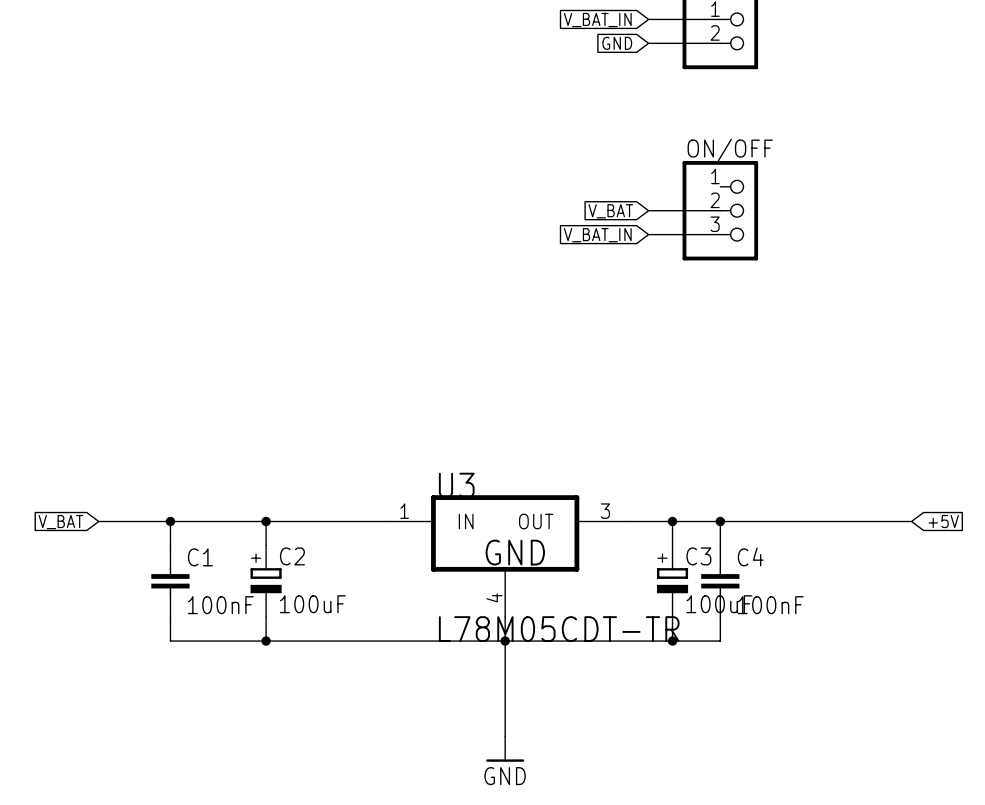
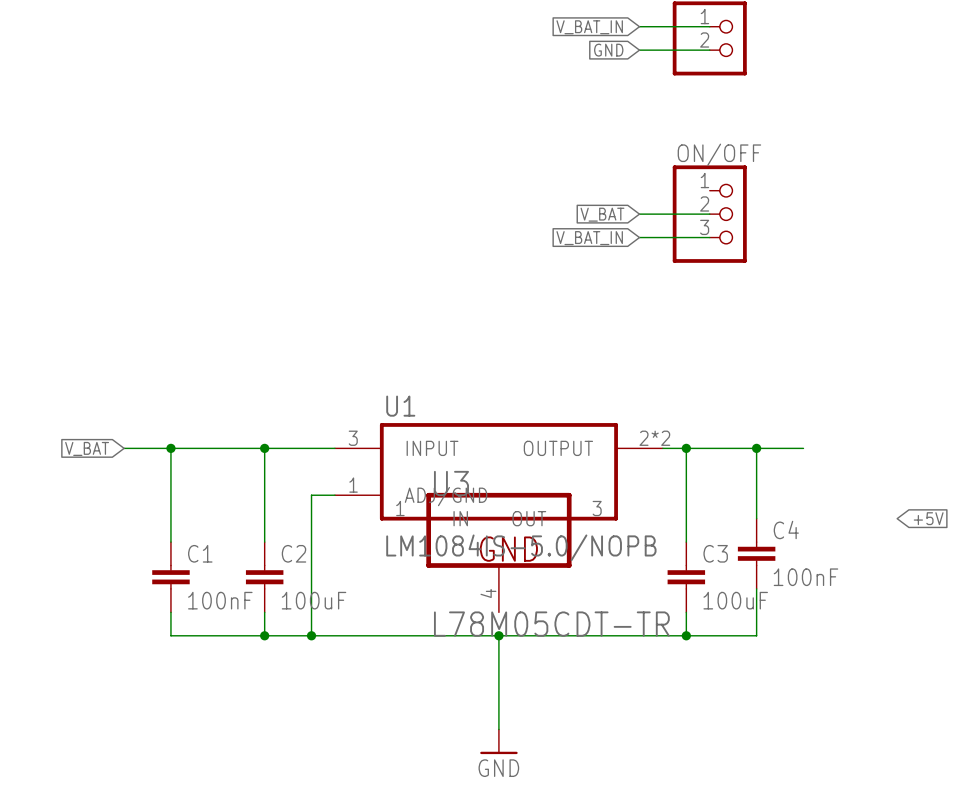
wire: none -> (124, 448) (334, 448)
wire: none -> (170, 448) (170, 518)
junction: none -> (170, 448)
wire: none -> (264, 448) (264, 518)
junction: none -> (264, 448)
wire: none -> (662, 448) (803, 448)
wire: none -> (686, 448) (686, 542)
junction: none -> (686, 448)
wire: none -> (756, 448) (756, 518)
junction: none -> (756, 448)
U1: none -> LM1084IS-5.0/NOPB (498, 471)
wire: none -> (334, 495) (311, 495) (311, 635)
wire: (98, 521) (385, 521) -> none
junction: (170, 521) -> none
junction: (266, 521) -> none
wire: (624, 521) (911, 521) -> none
wire: (672, 521) (672, 545) -> none
junction: (672, 521) -> none
wire: (720, 521) (720, 545) -> none
junction: (720, 521) -> none
global label position: V_BAT (60, 522) -> V_BAT (87, 448)
C2 symbol: [250, 545, 282, 618] -> [245, 542, 284, 613]
C3 symbol: [656, 545, 689, 618] -> [667, 542, 706, 613]
C4 position: (720, 581) -> (756, 553)
wire: (505, 617) (505, 641) -> none
wire: (672, 617) (672, 641) -> (686, 612) (686, 635)
wire: (720, 617) (720, 641) -> (756, 588) (756, 635) (709, 635)
junction: none -> (311, 635)
junction position: (672, 641) -> (686, 635)

